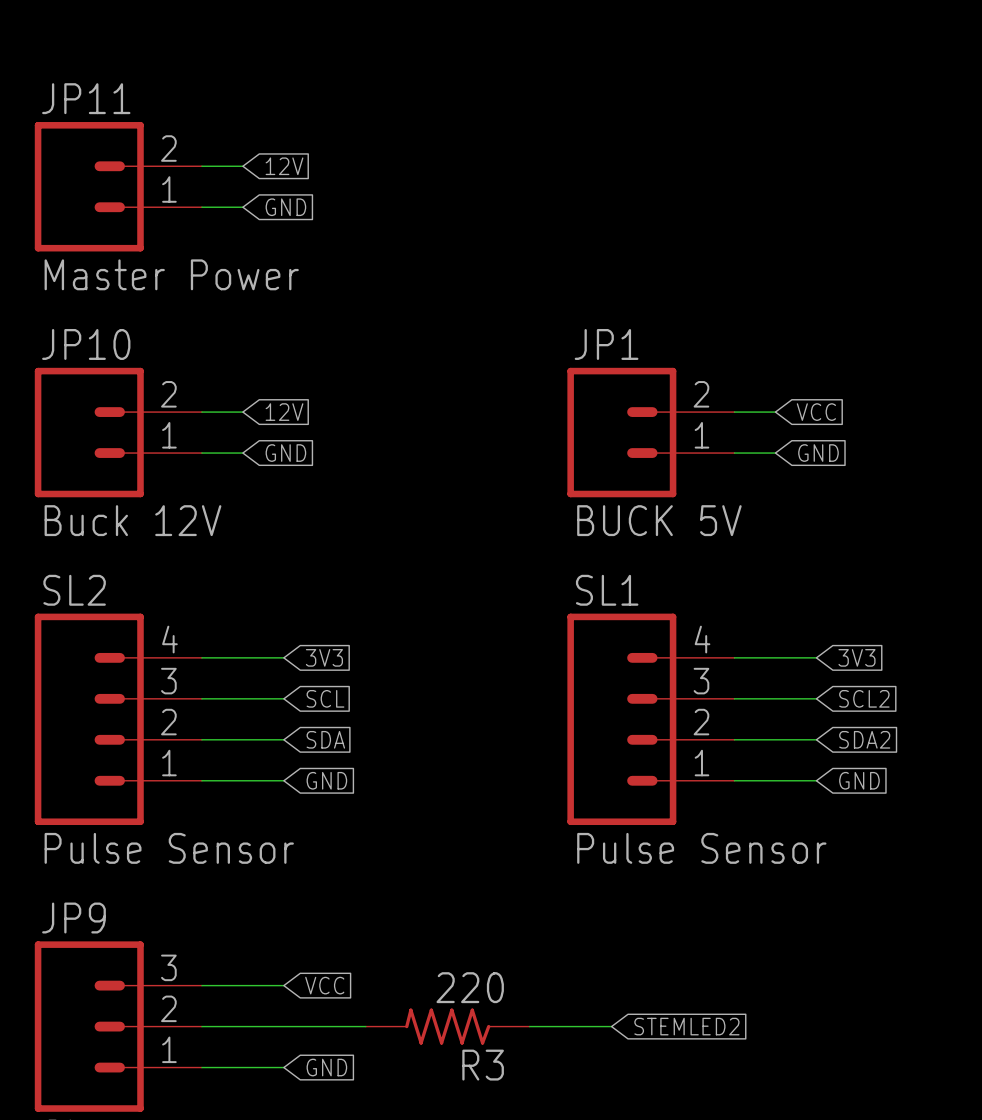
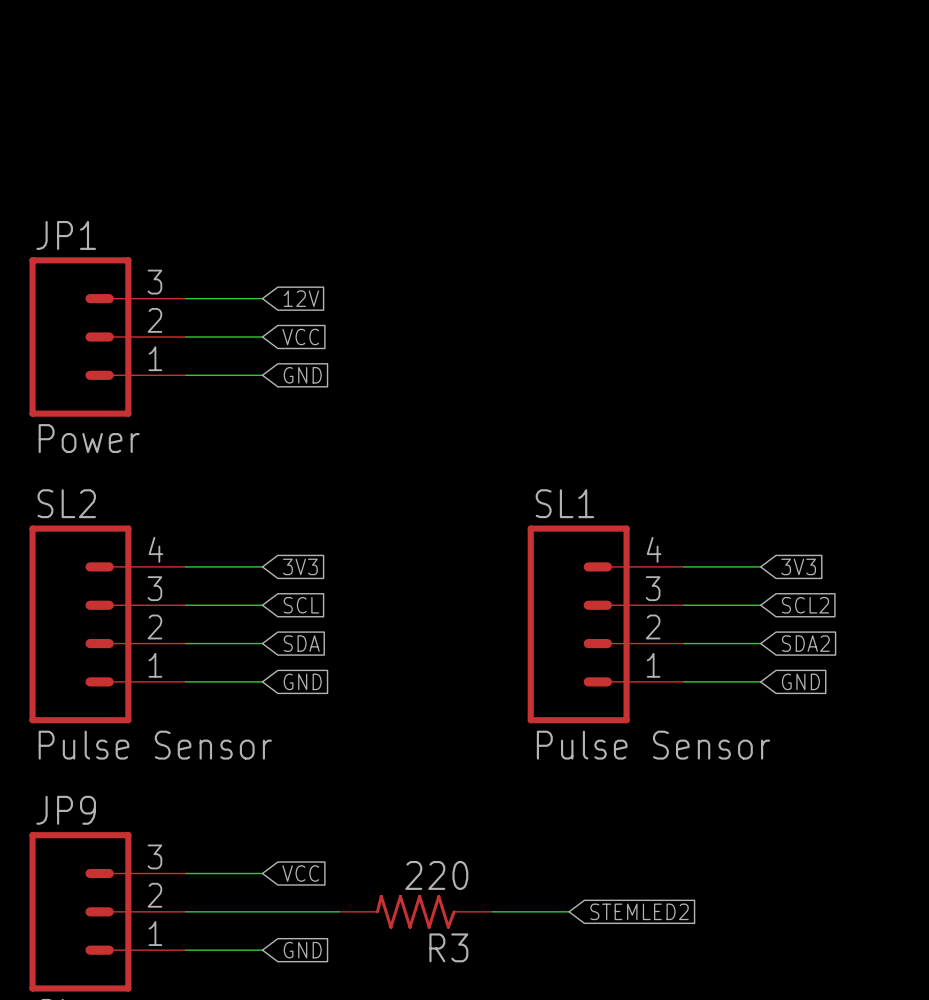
wire: (201, 166) (242, 166) -> (224, 336) (262, 336)
global label: 12V (284, 166) -> none
JP11: Master Power (118, 186) -> none
wire: (201, 207) (242, 207) -> (224, 375) (262, 375)
global label: GND (285, 207) -> none
JP1 symbol: [567, 367, 735, 498] -> [29, 257, 186, 417]
wire: none -> (185, 298) (262, 298)
global label position: 12V (284, 412) -> 12V (301, 298)
global label: none -> VCC (300, 336)
wire: (734, 412) (775, 412) -> none
global label: VCC (816, 412) -> none
JP10: Buck 12V (118, 432) -> none
global label position: GND (285, 453) -> GND (302, 375)
wire: (734, 453) (775, 453) -> none
global label: GND (818, 453) -> none
JP1 value: BUCK 5V (659, 520) -> Power (89, 438)

